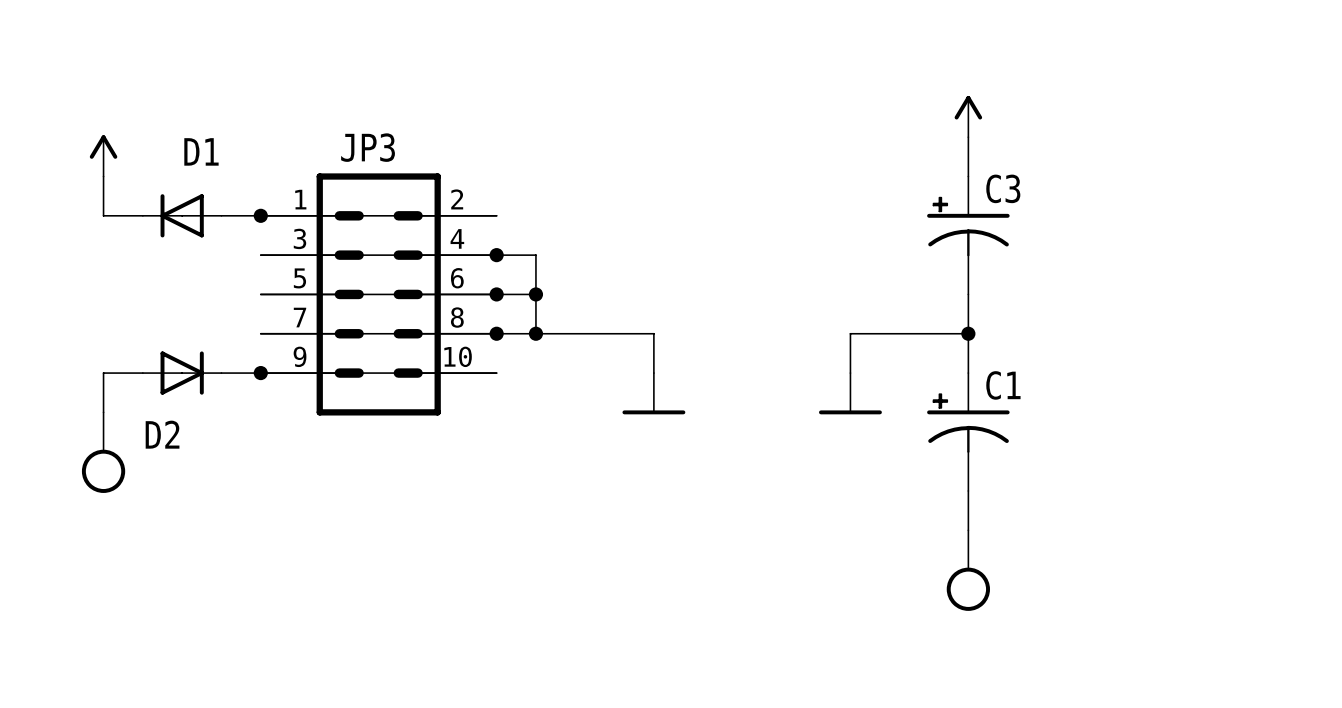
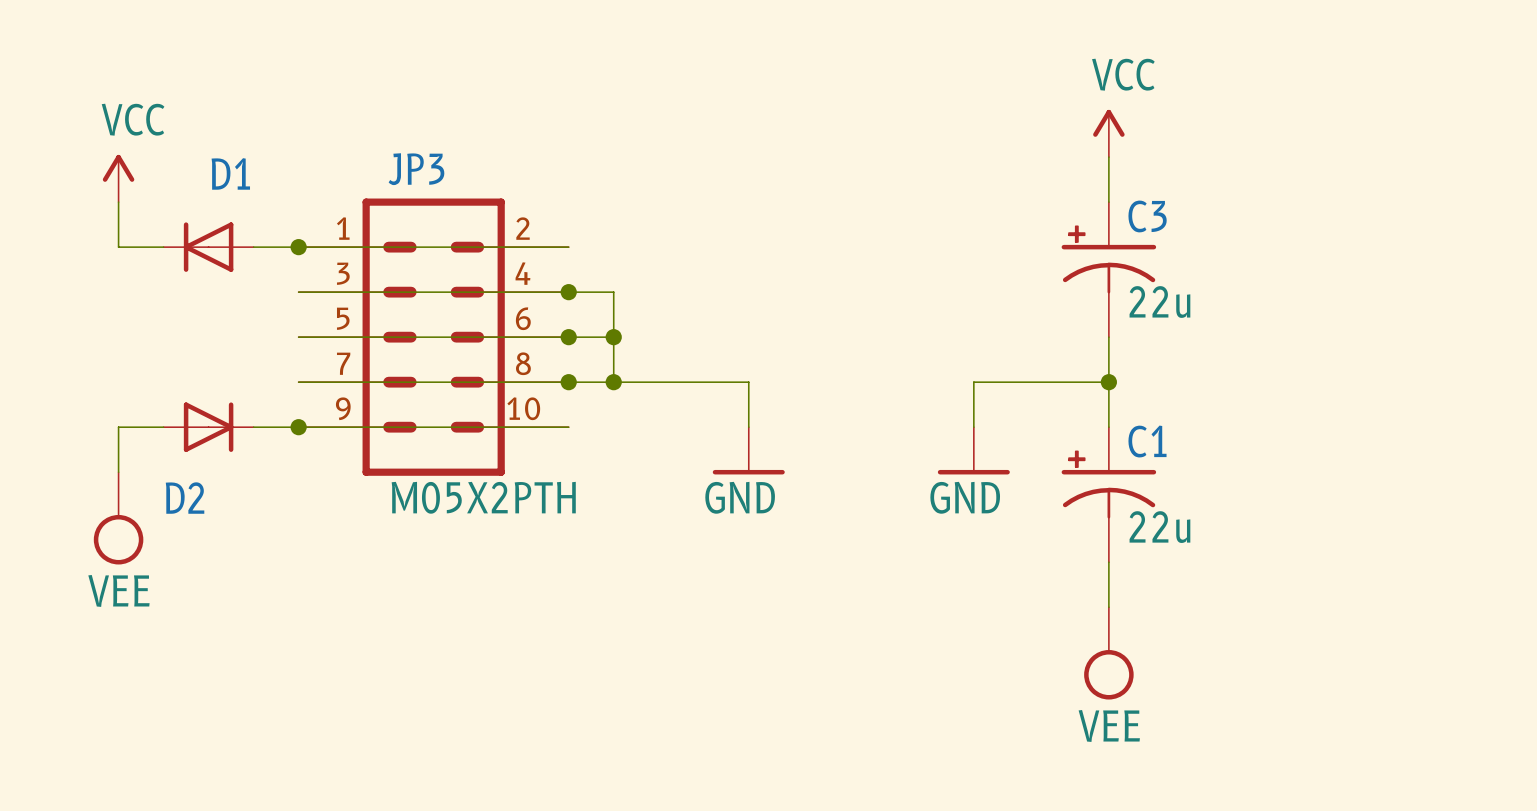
power symbol text: none -> VCC (1123, 74)
power symbol text: none -> VCC (133, 119)
C3 value: none -> 22u (1159, 302)
JP3 value: none -> M05X2PTH (483, 497)
power symbol text: none -> GND (740, 497)
power symbol text: none -> GND (965, 497)
C1 value: none -> 22u (1159, 527)
power symbol text: none -> VEE (118, 590)
power symbol text: none -> VEE (1109, 725)

